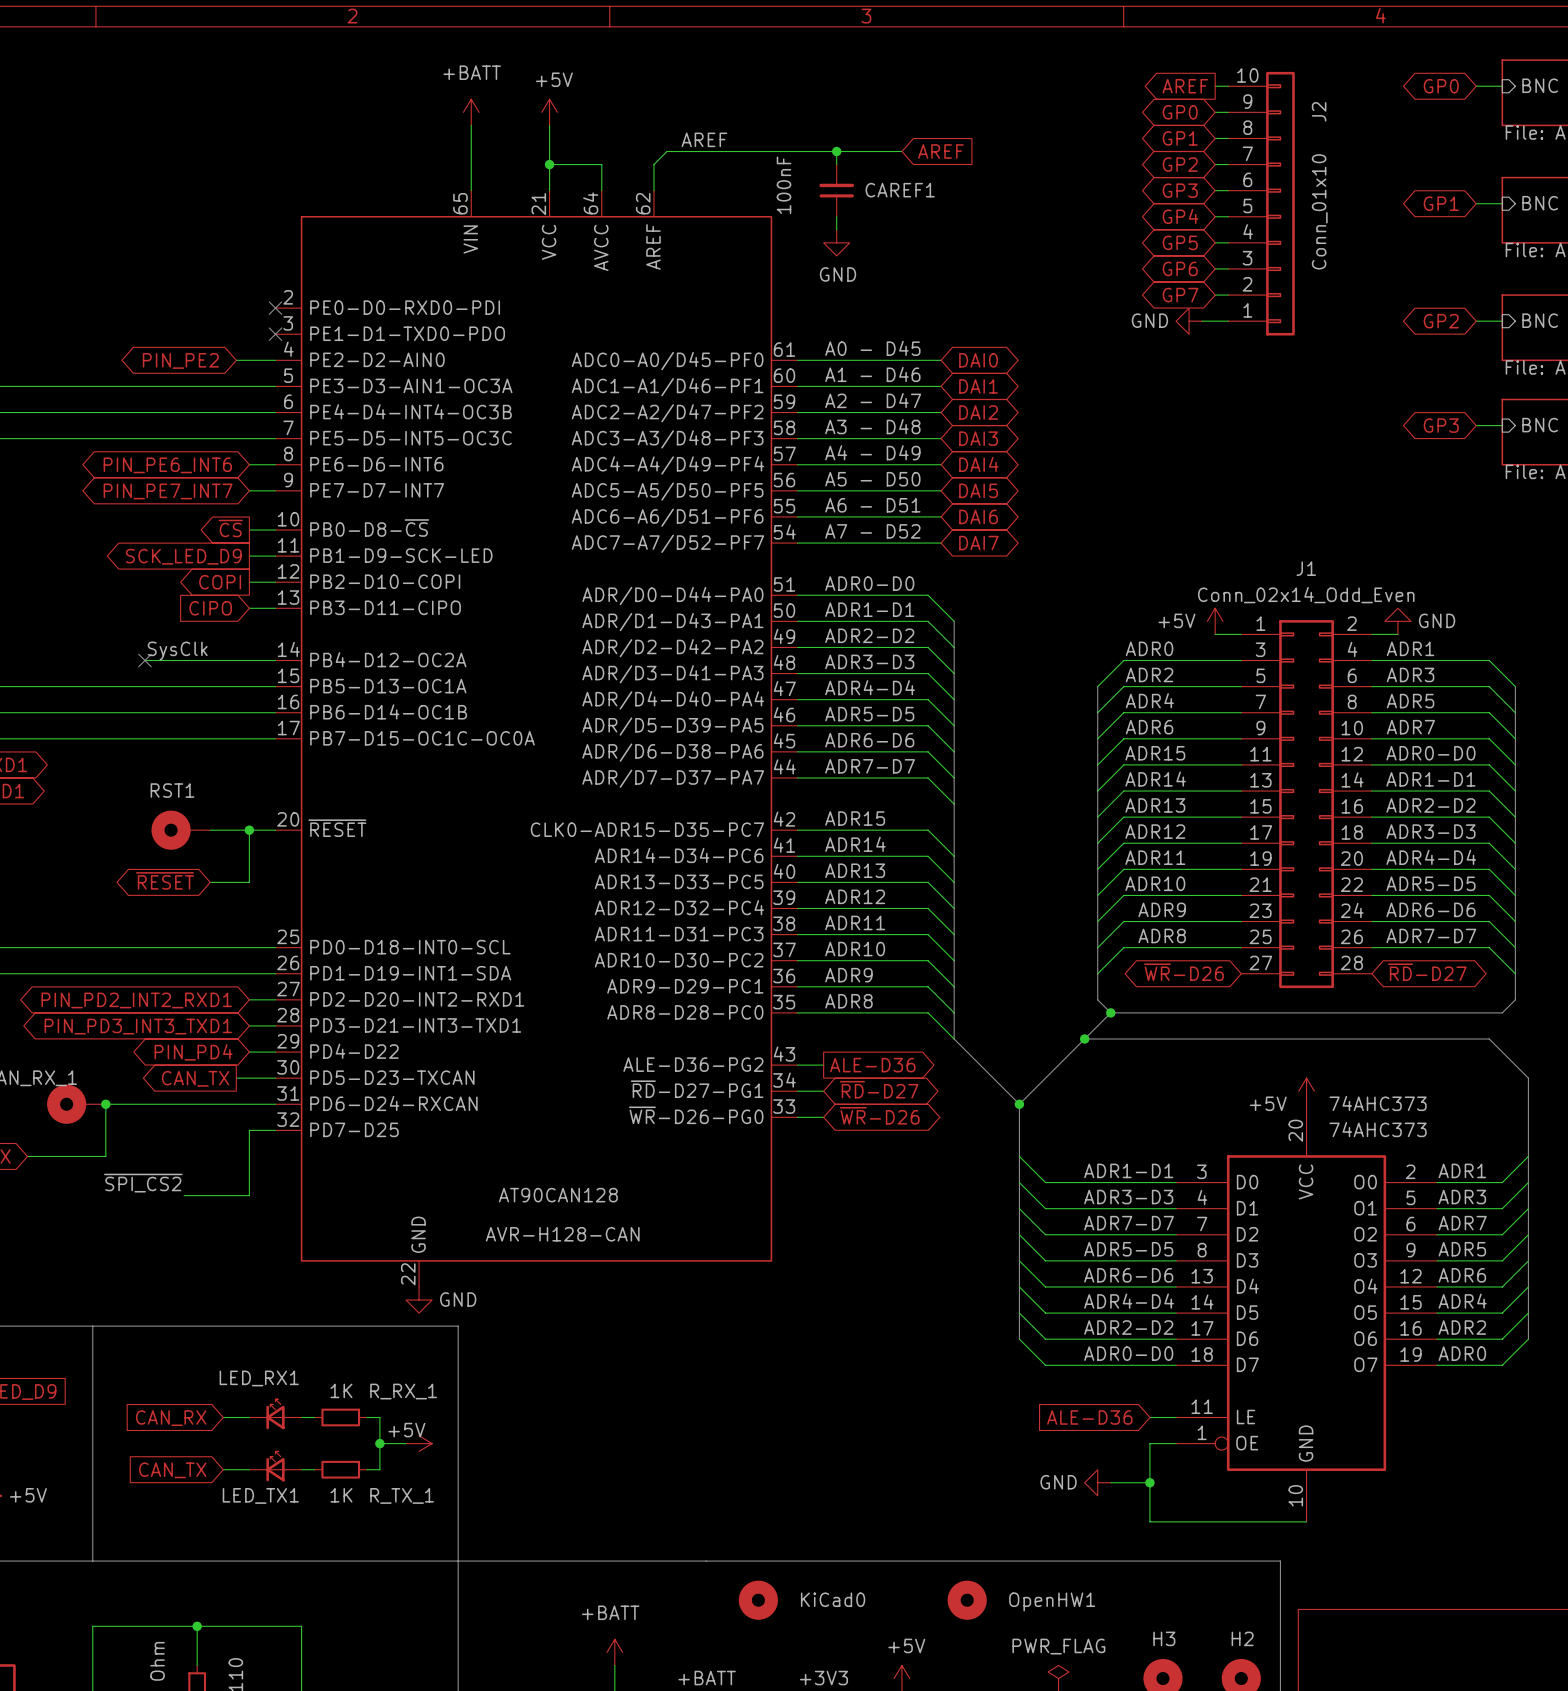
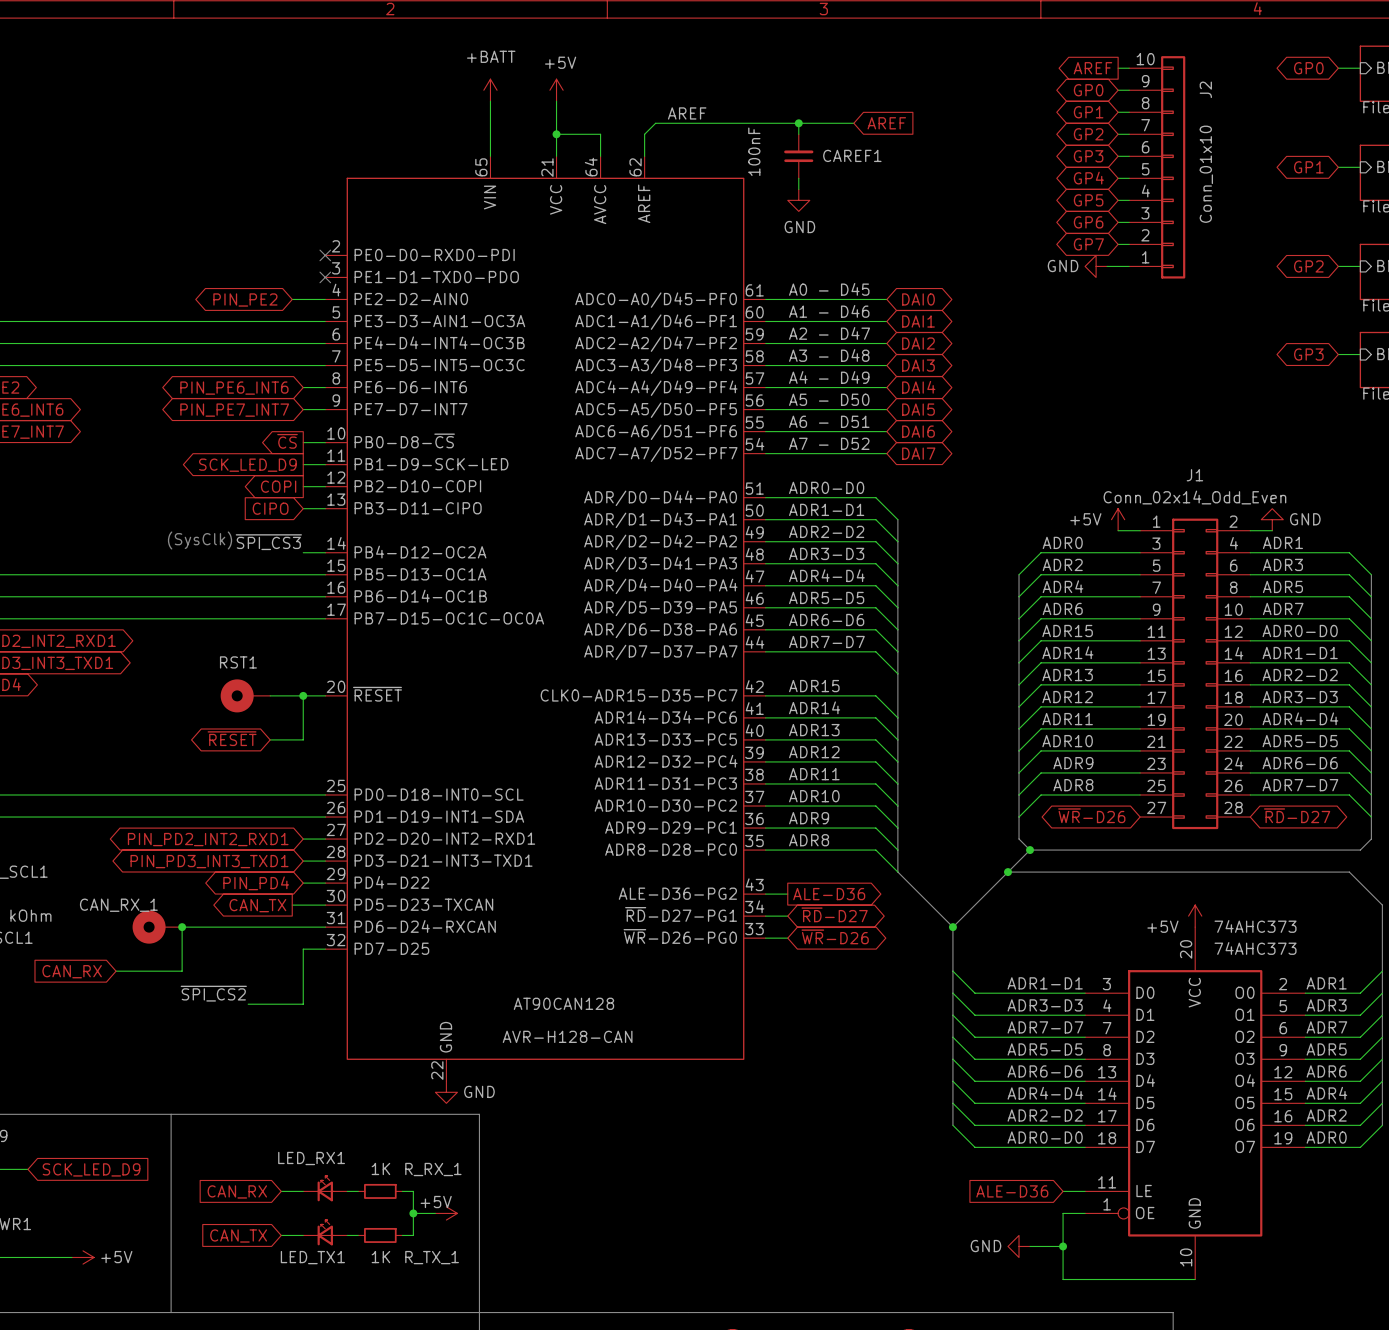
text: none -> (SysClk) (200, 540)
label: none -> ~{SPI_CS3} (268, 542)
label: SysClk (177, 651) -> none
wire: (144, 660) (249, 660) -> none
no-connect mark: (144, 660) -> none

